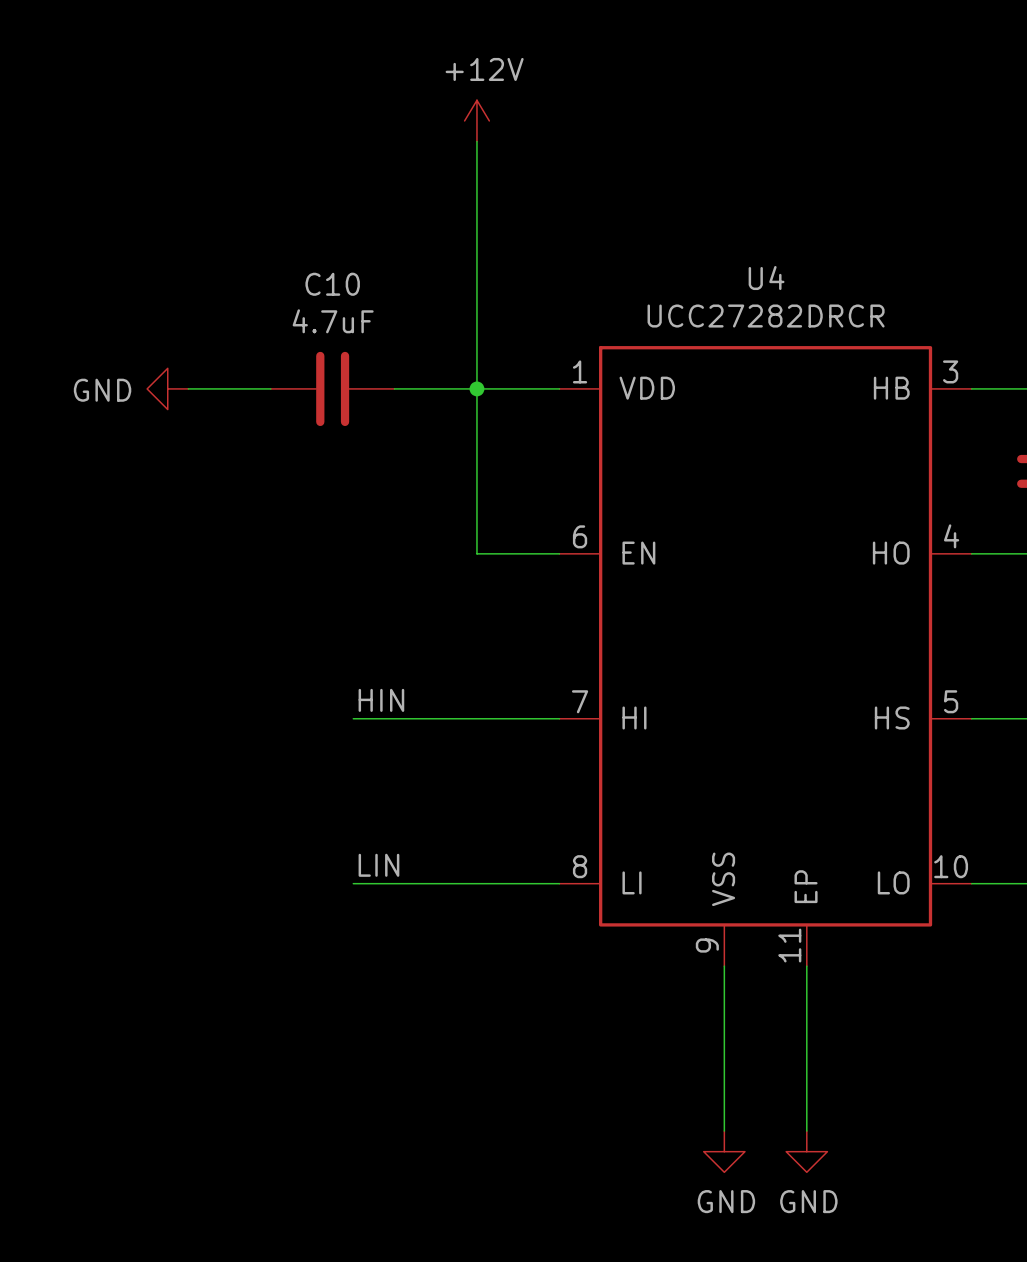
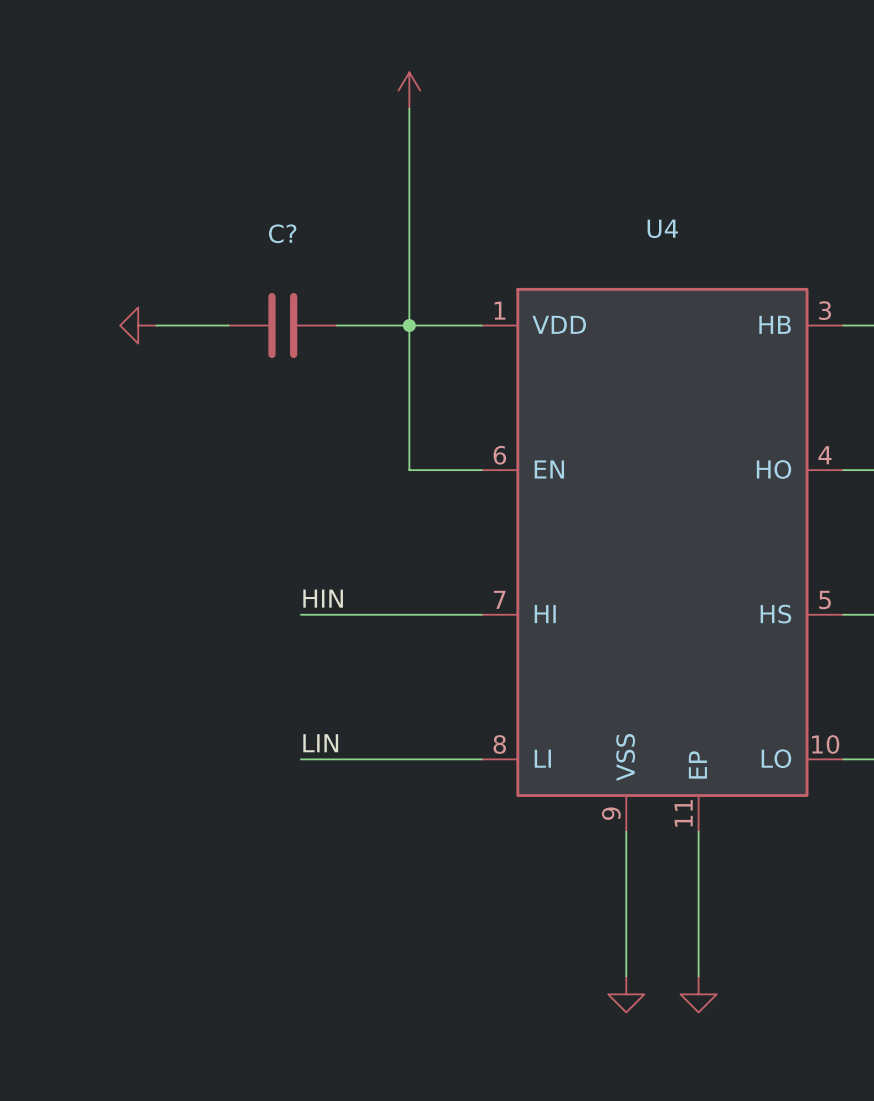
power symbol text: +12V (484, 69) -> none
C10 name: C10 (332, 284) -> C? (282, 233)
U4 value: UCC27282DRCR (766, 316) -> none
C10 value: 4.7uF (333, 321) -> none
power symbol text: GND (102, 390) -> none
power symbol text: GND (726, 1201) -> none
power symbol text: GND (808, 1201) -> none

